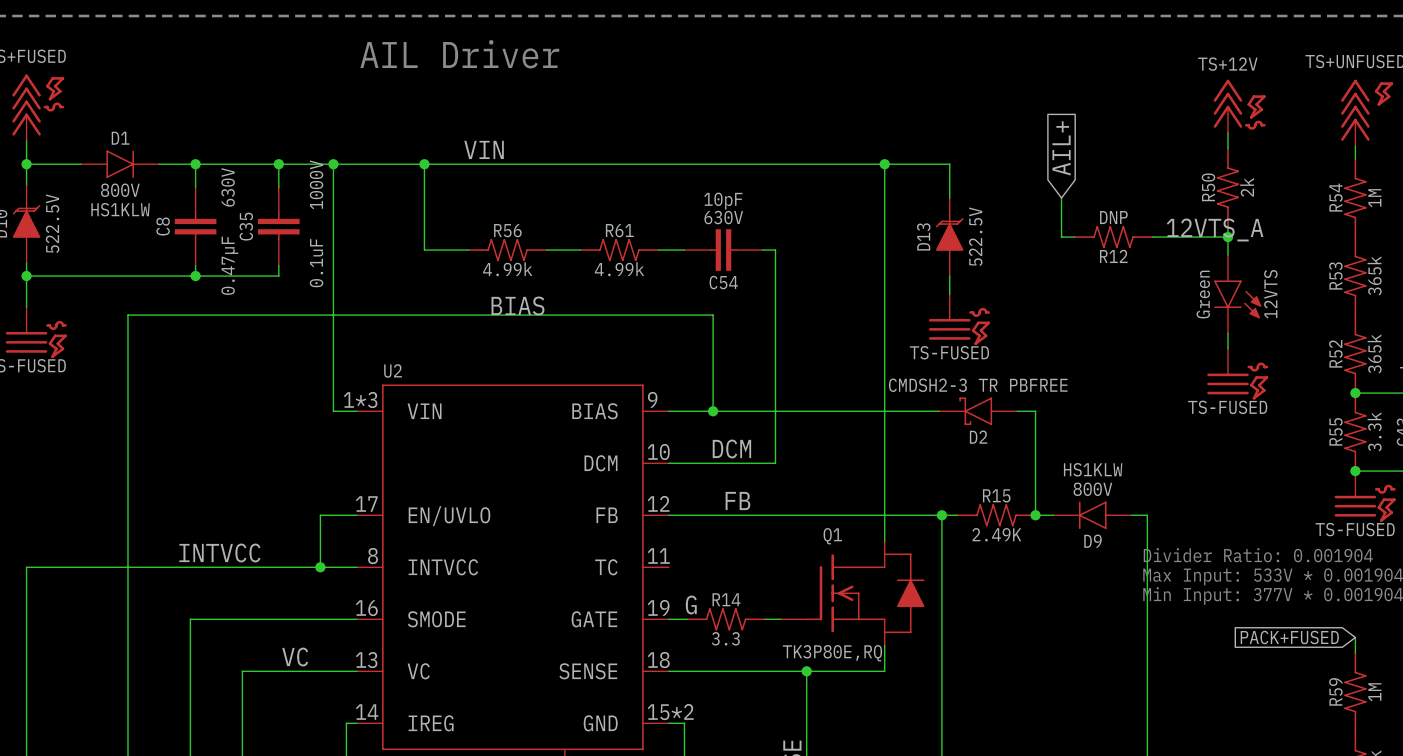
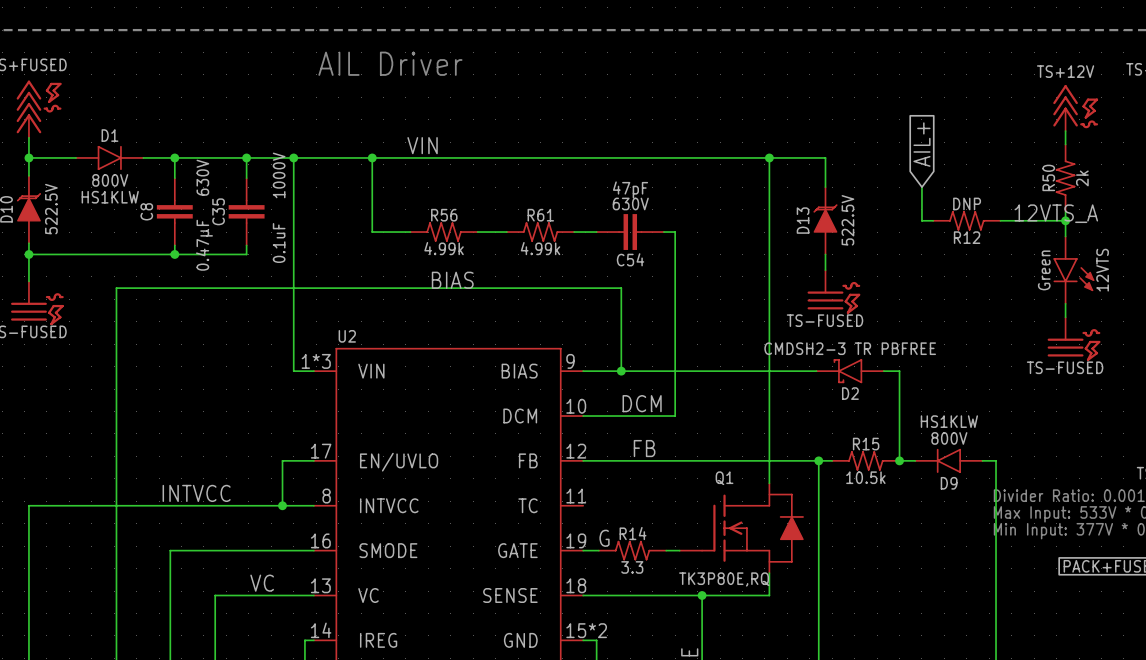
C54 text: 10pF (723, 201) -> 47pF (630, 189)
R15 text: 2.49K (996, 534) -> 10.5k (865, 477)

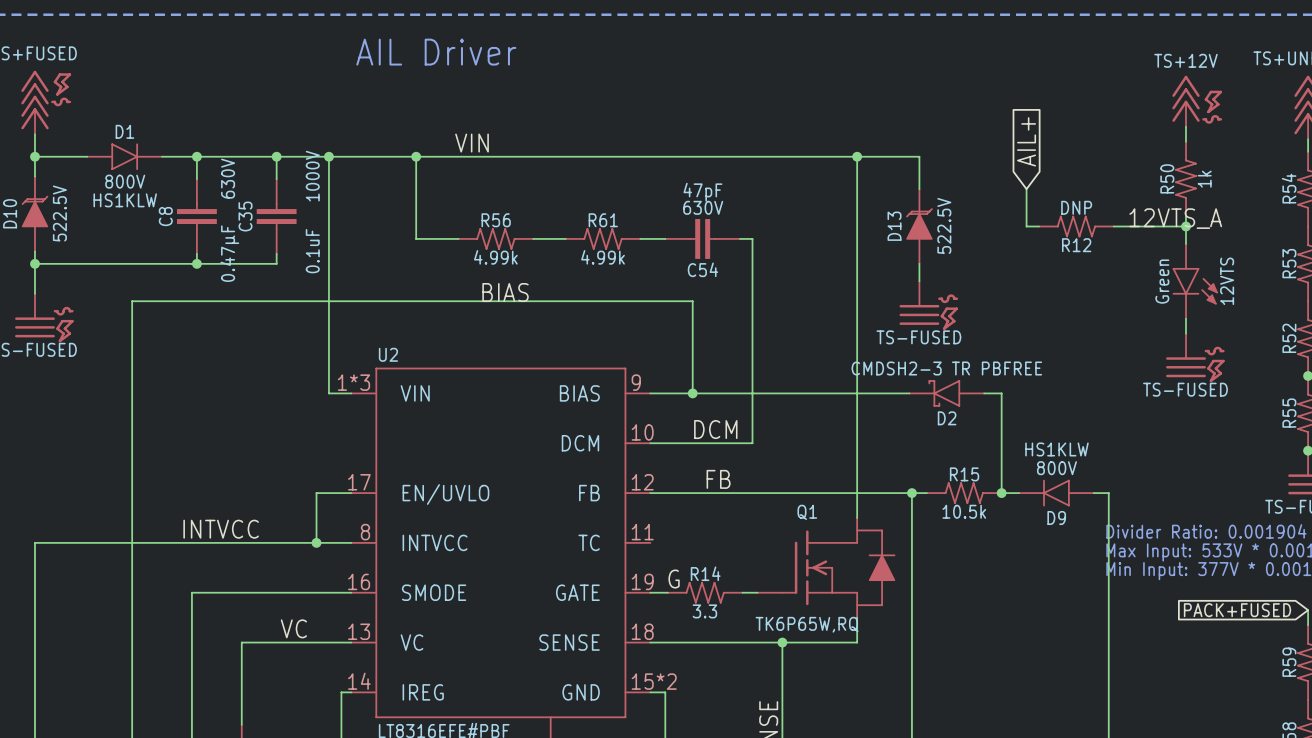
R50 text: 2k (1082, 178) -> 1k (1204, 179)
Q1 text: TK3P80E,RQ (724, 579) -> TK6P65W,RQ (807, 624)

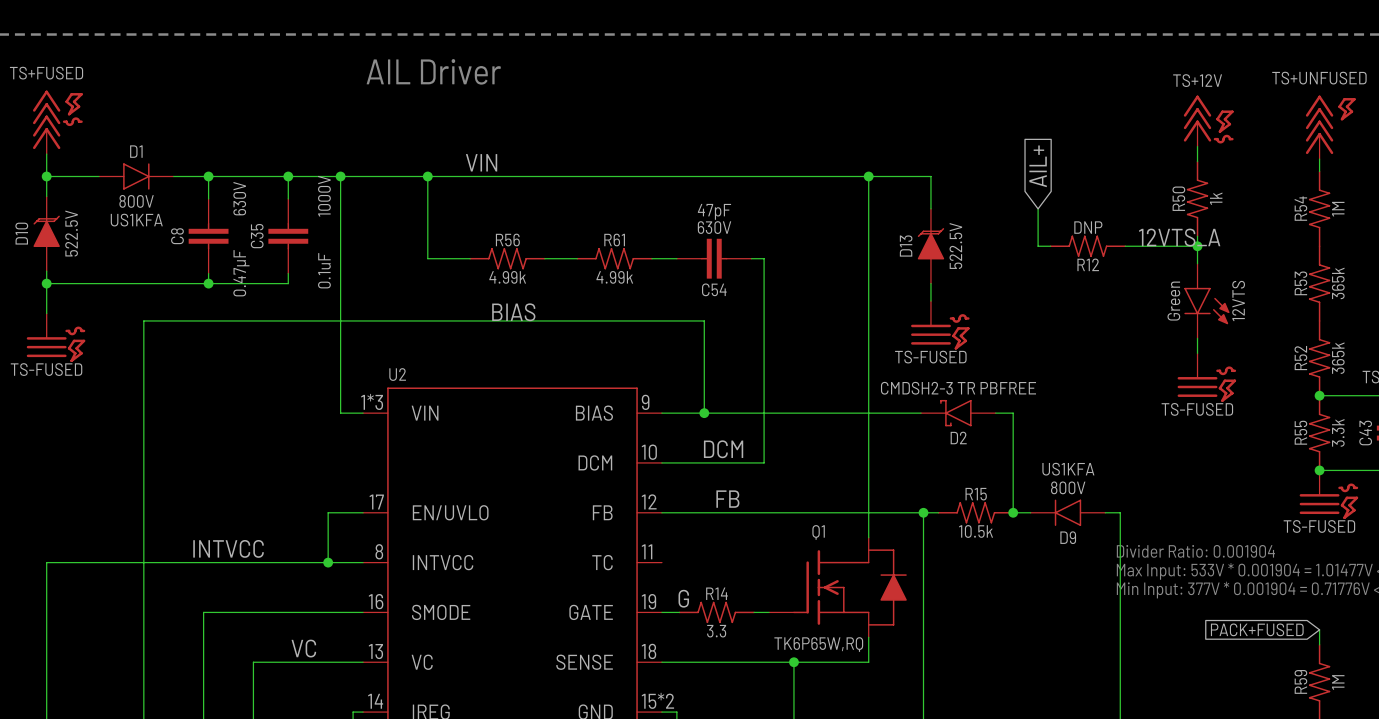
D1 text: HS1KLW (125, 200) -> US1KFA (136, 220)
D9 text: HS1KLW (1056, 449) -> US1KFA (1068, 469)

